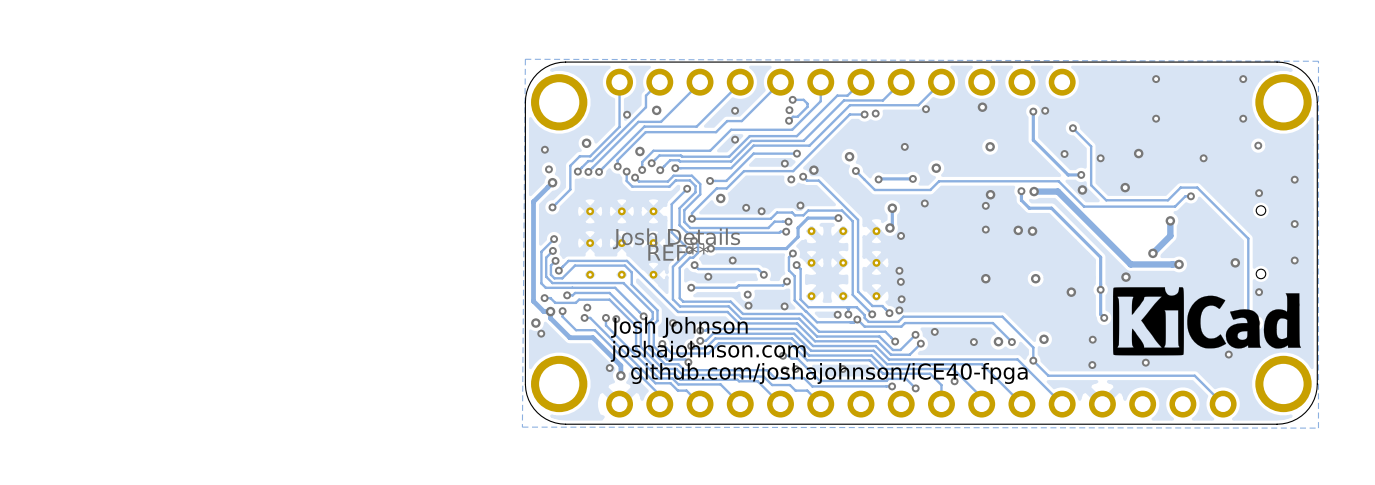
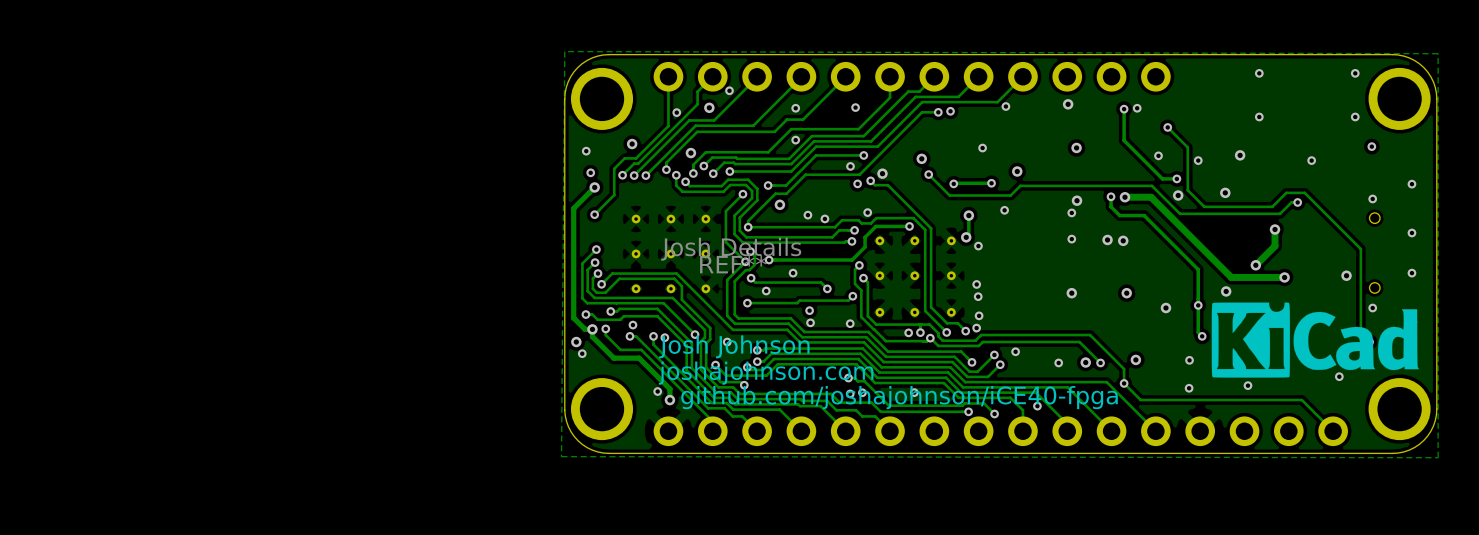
via: none -> (729, 90)
track: (792, 99) (803, 99) (807, 106) (797, 116) (792, 116) (789, 120) -> none
via: (792, 99) -> none
via: (789, 120) -> none

